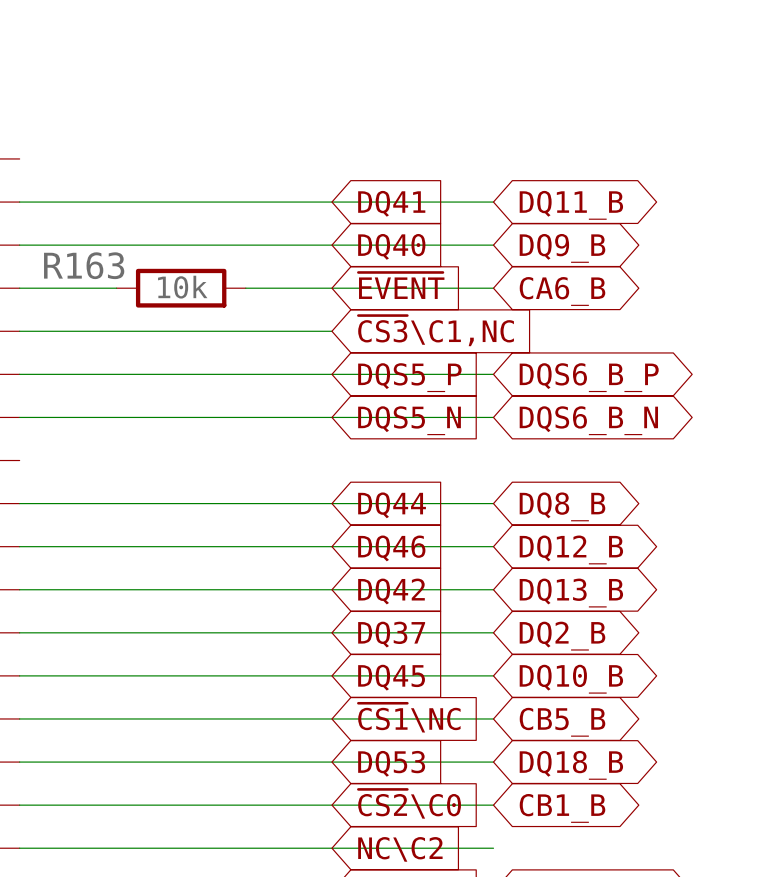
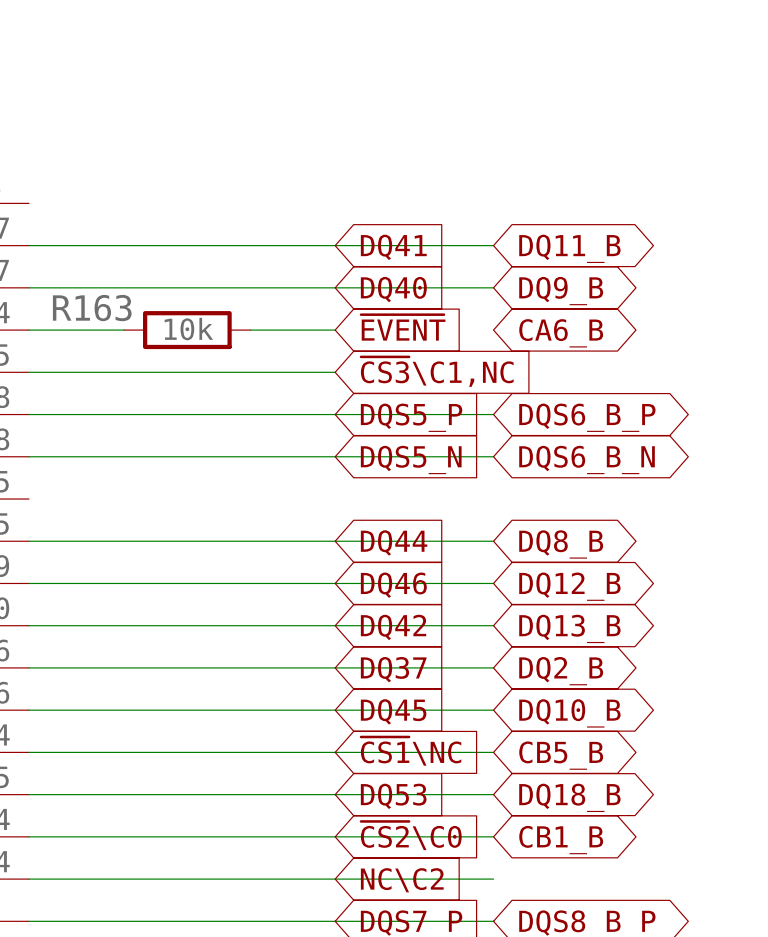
wire: (331, 288) (493, 288) -> none

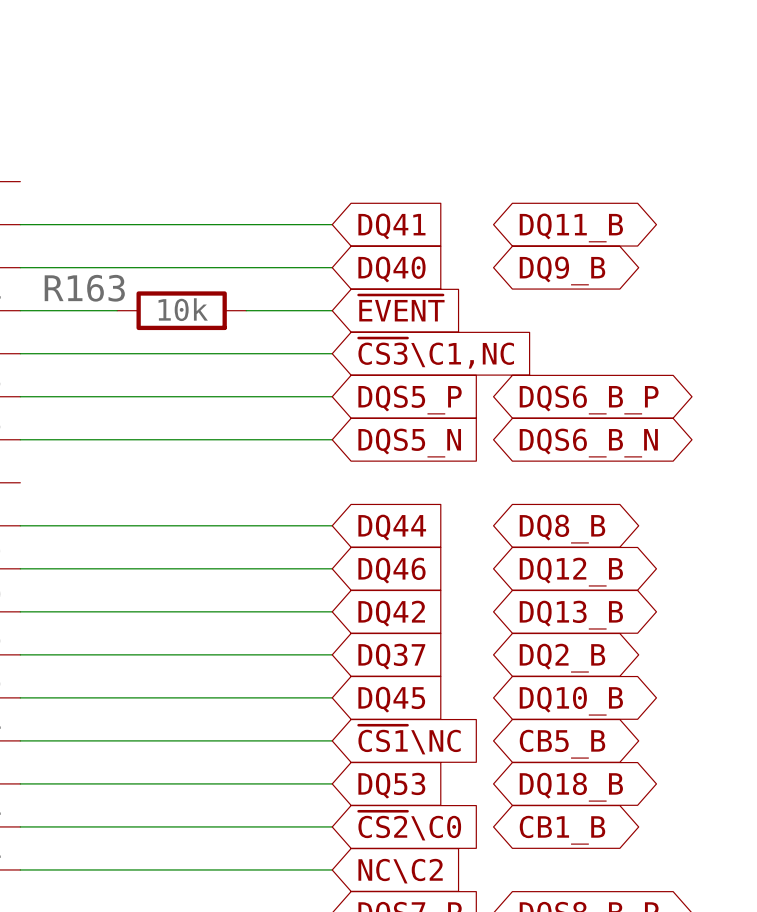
wire: (335, 245) (493, 245) -> none
wire: (335, 287) (493, 287) -> none
global label: CA6_B (561, 333) -> none
wire: (335, 414) (493, 414) -> none
wire: (335, 456) (493, 456) -> none
wire: (335, 541) (493, 541) -> none
wire: (335, 583) (493, 583) -> none
wire: (335, 625) (493, 625) -> none
wire: (335, 667) (493, 667) -> none
wire: (335, 710) (493, 710) -> none
wire: (335, 752) (493, 752) -> none
wire: (335, 794) (493, 794) -> none
wire: (335, 836) (493, 836) -> none
wire: (335, 879) (493, 879) -> none

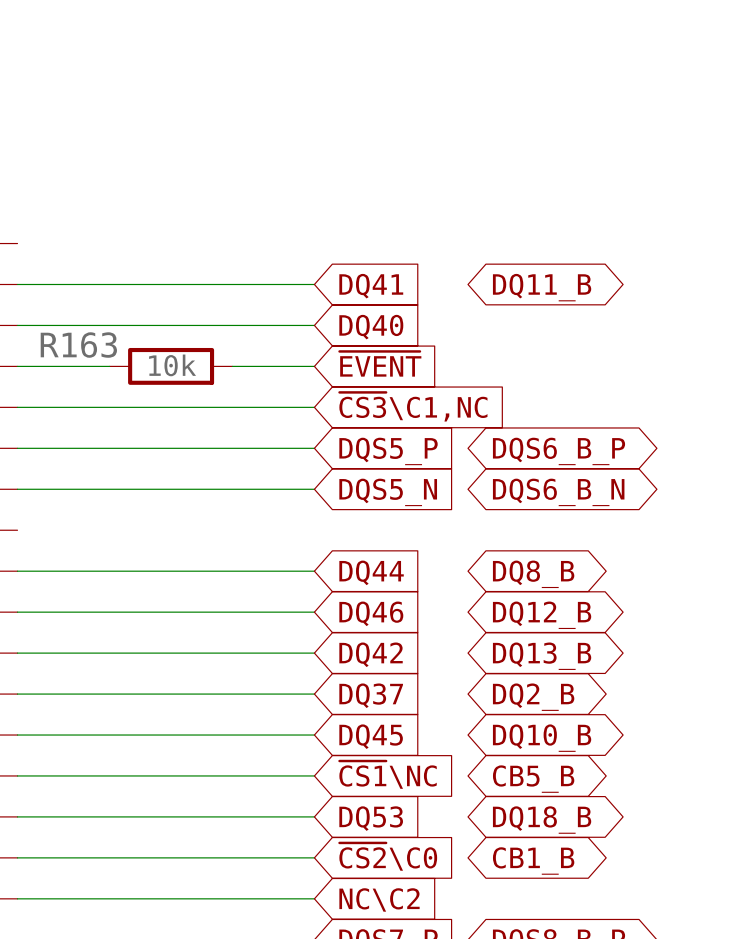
global label: DQ9_B (562, 270) -> none

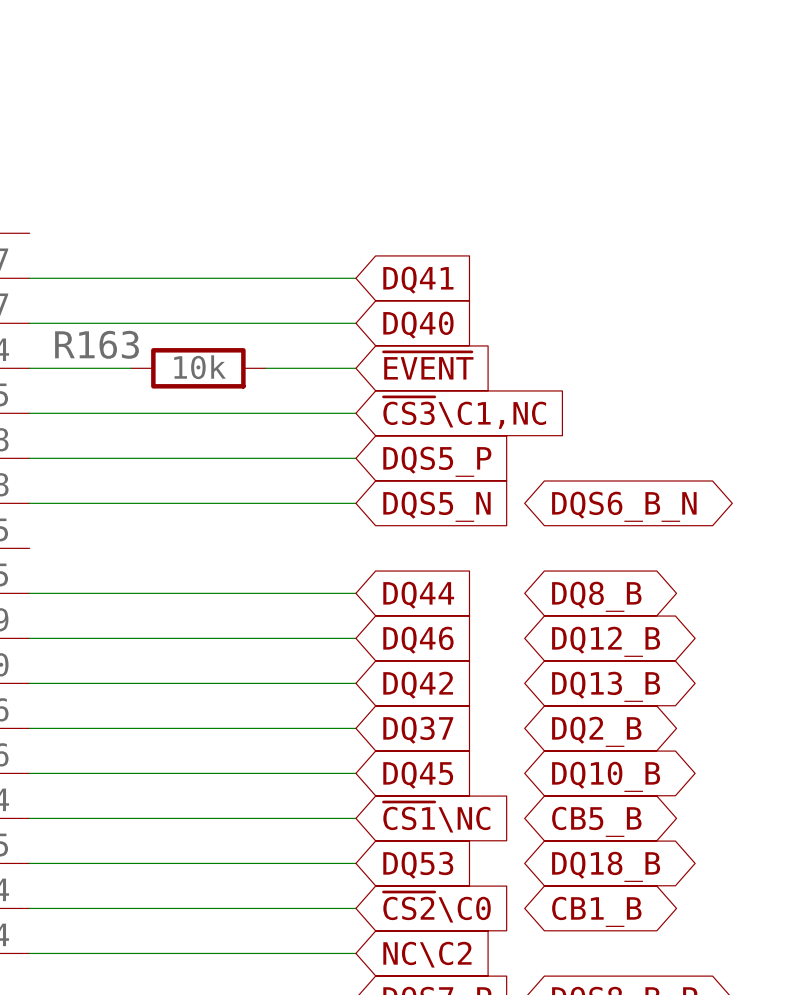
global label: DQ11_B (542, 287) -> none
global label: DQS6_B_P (559, 451) -> none

